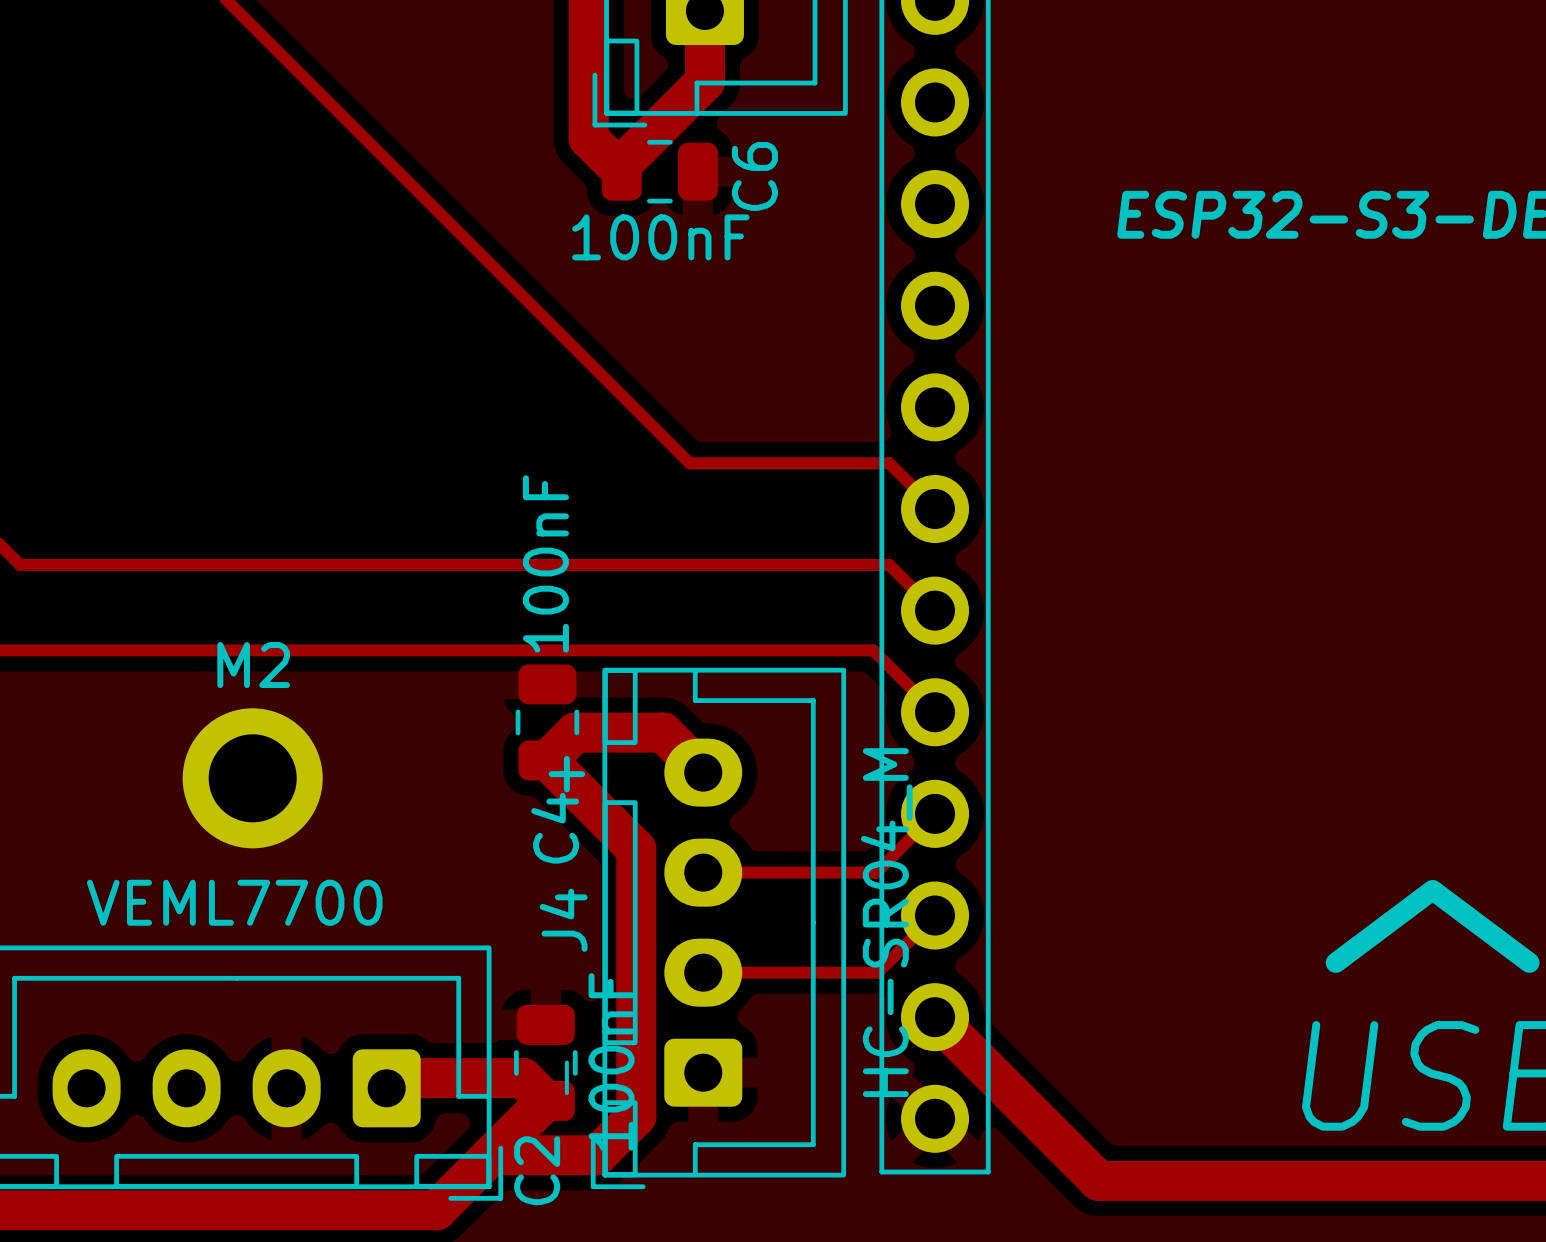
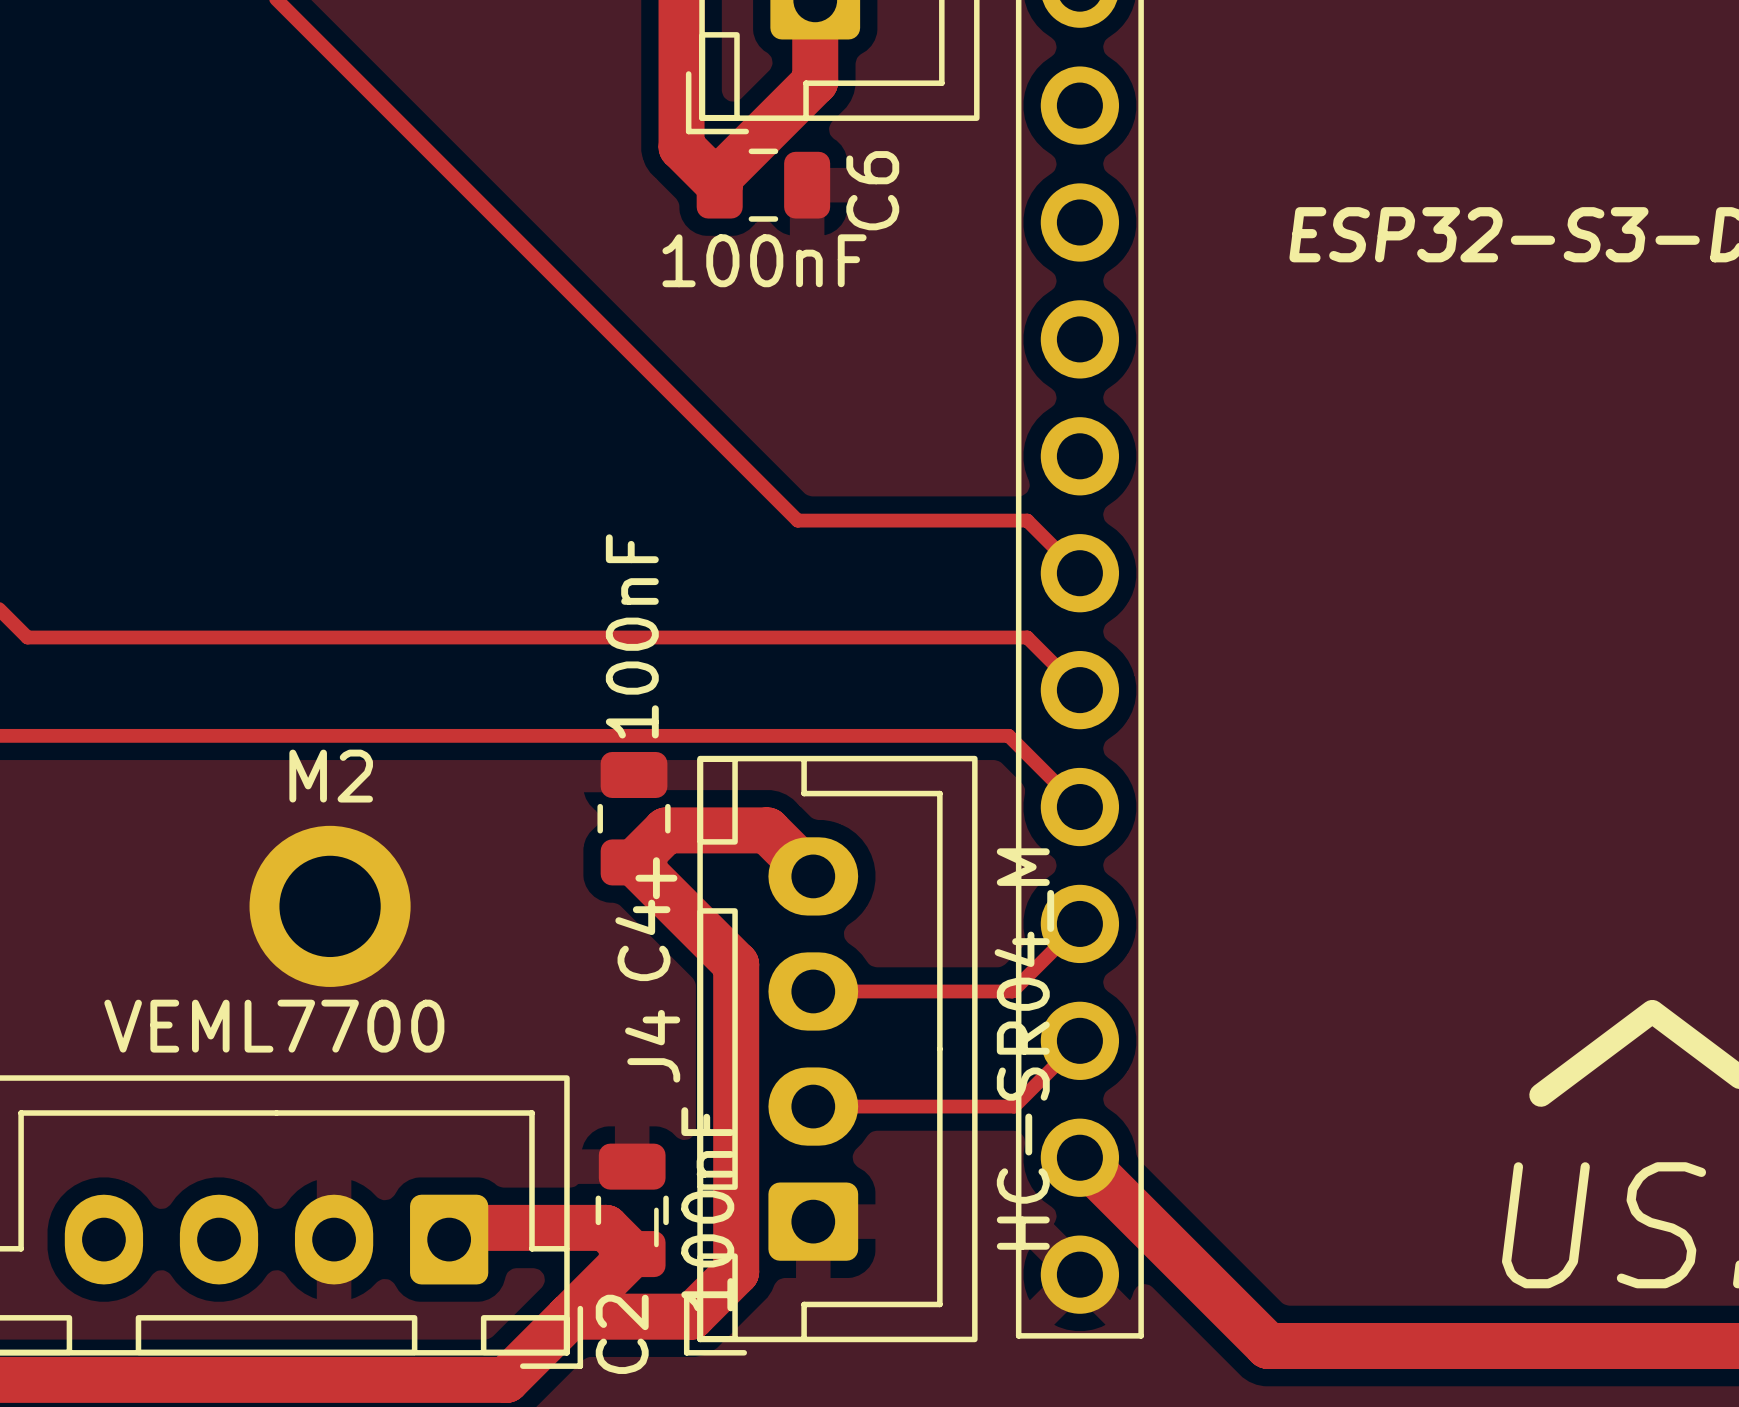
part position: (252, 778) -> (330, 906)

